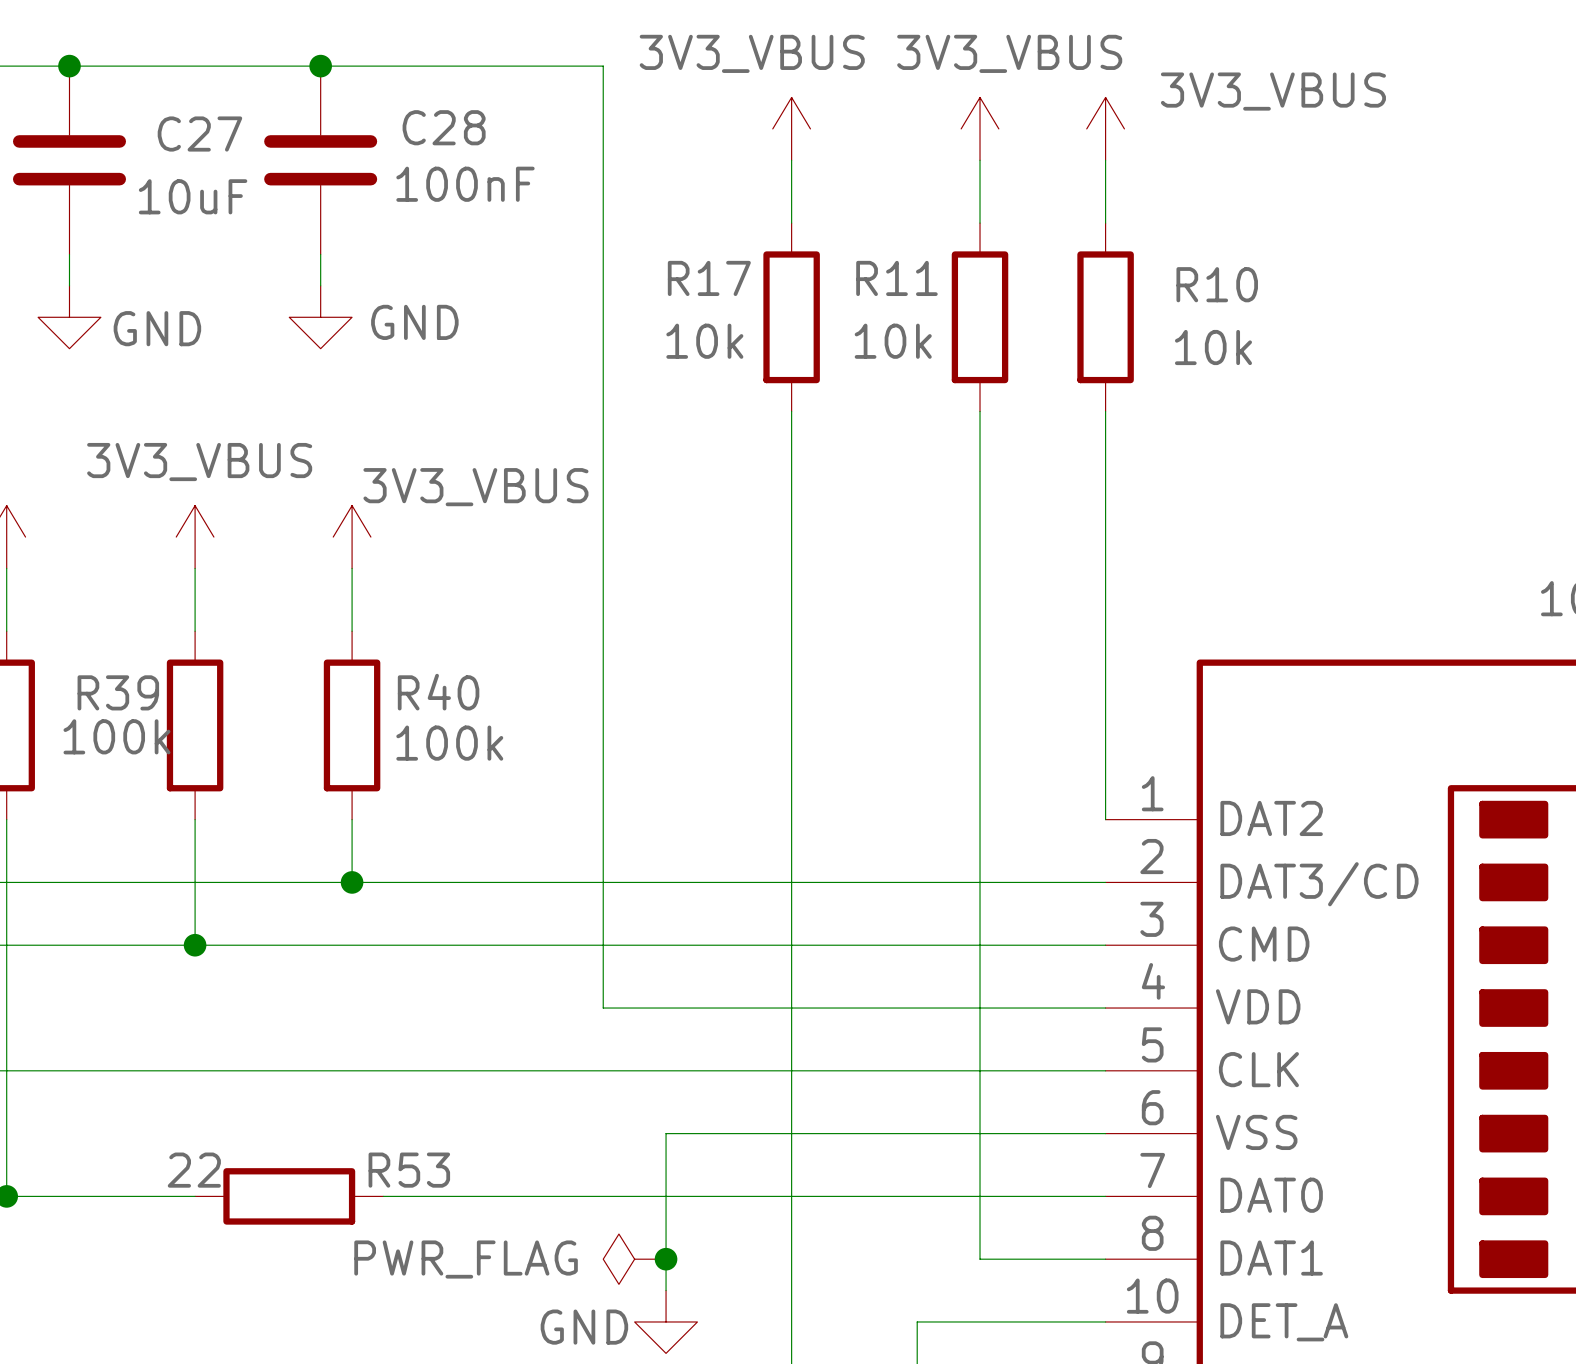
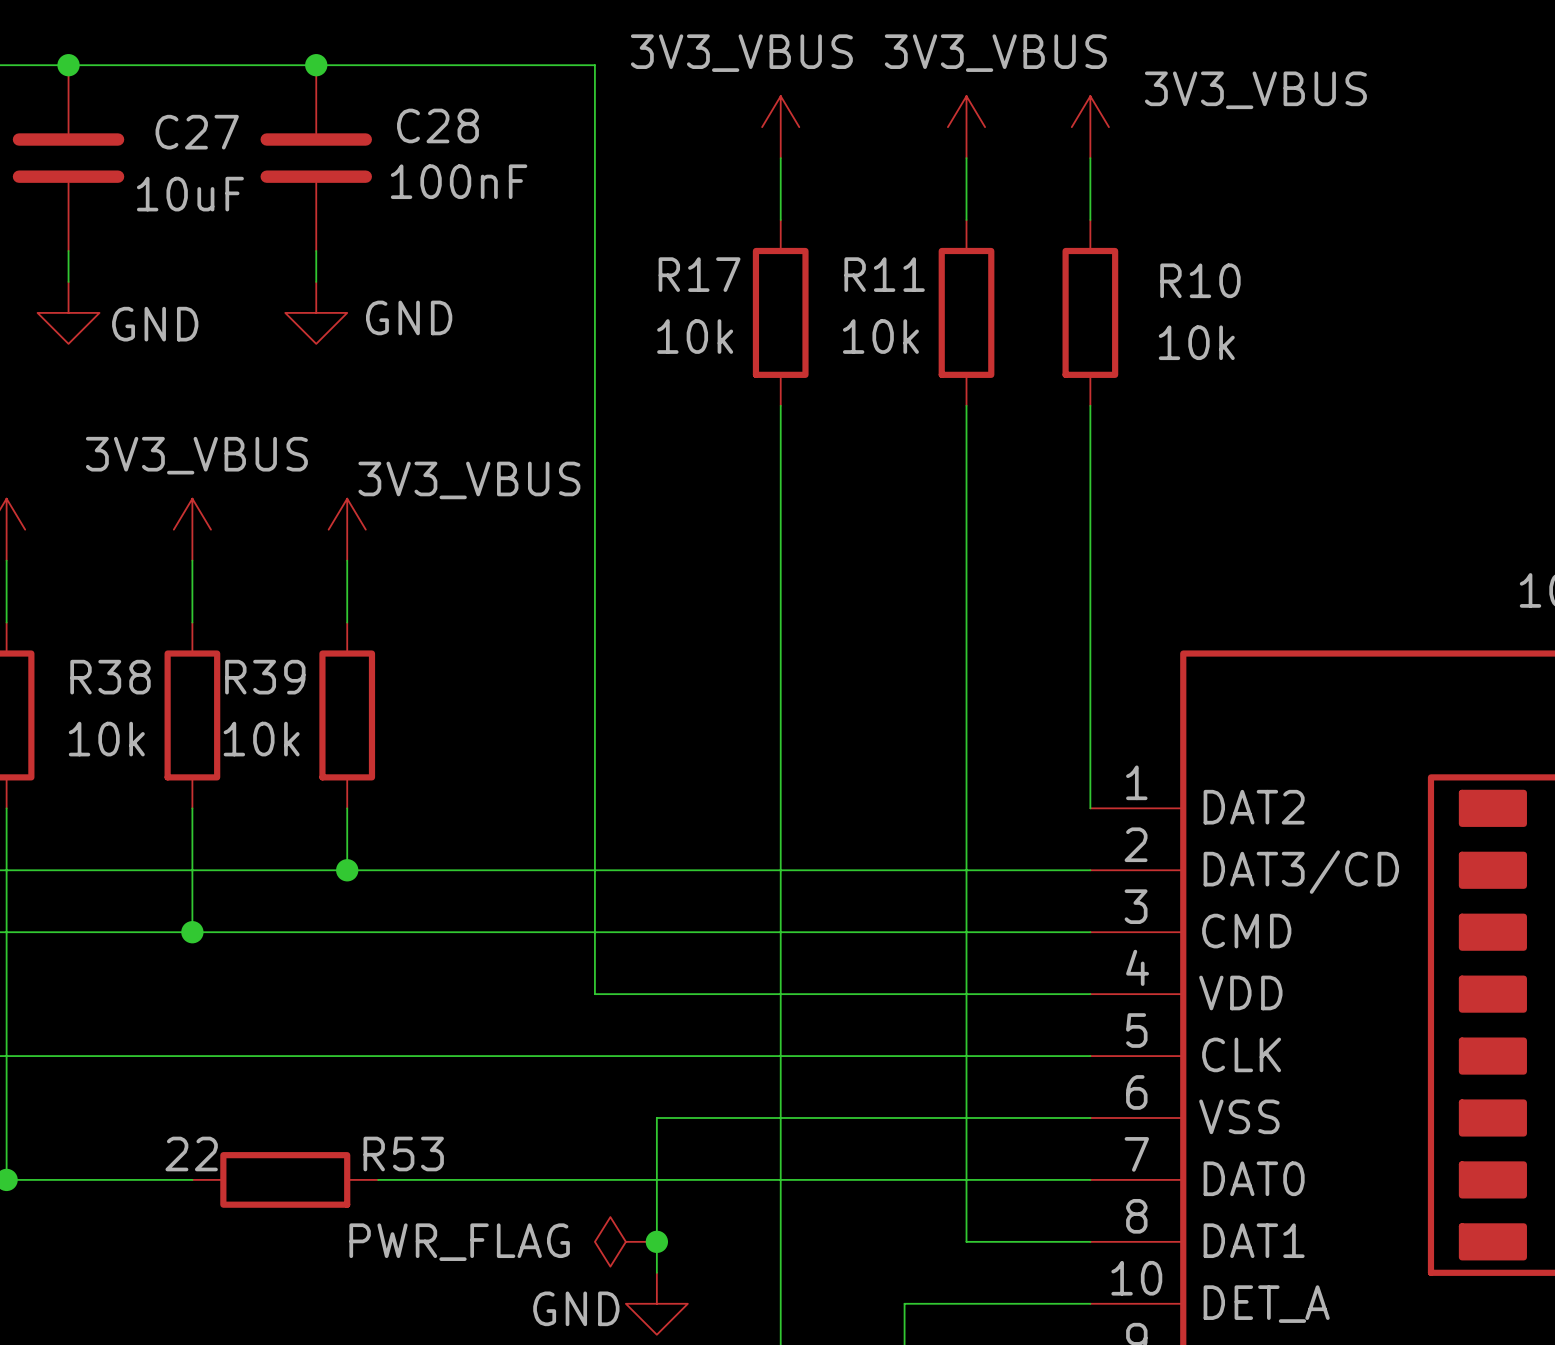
R39 name: R39 (118, 692) -> R38 (110, 677)
R40 name: R40 (438, 692) -> R39 (265, 677)
R39 value: 100k (116, 736) -> 10k (106, 739)
R40 value: 100k (449, 743) -> 10k (261, 739)

